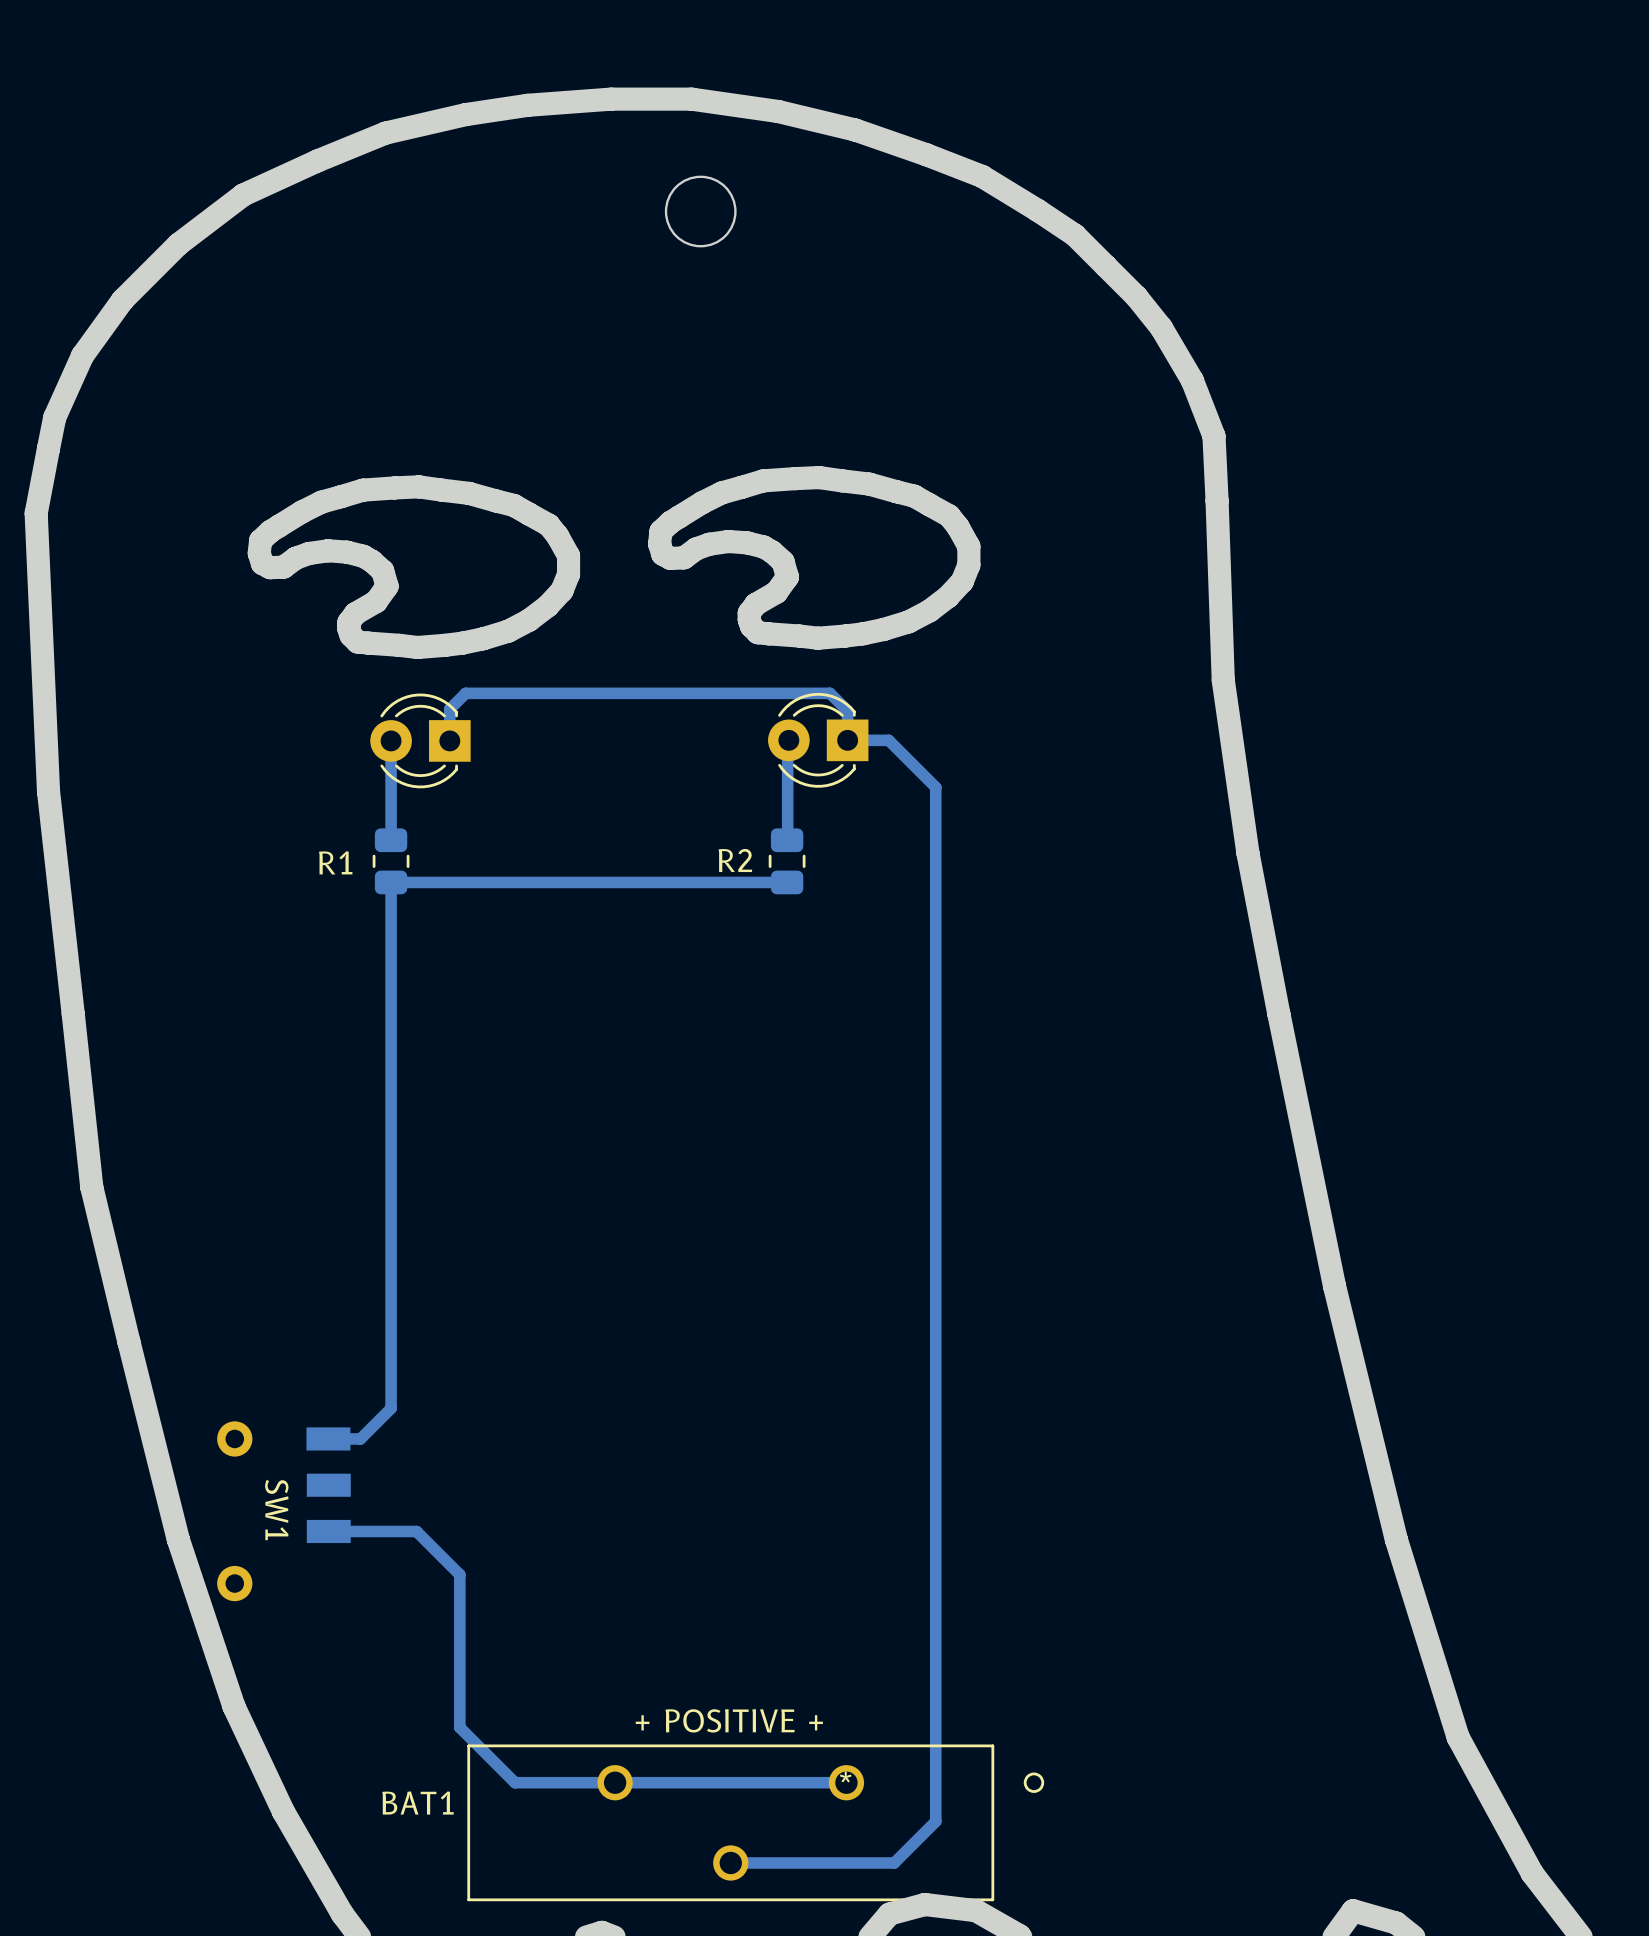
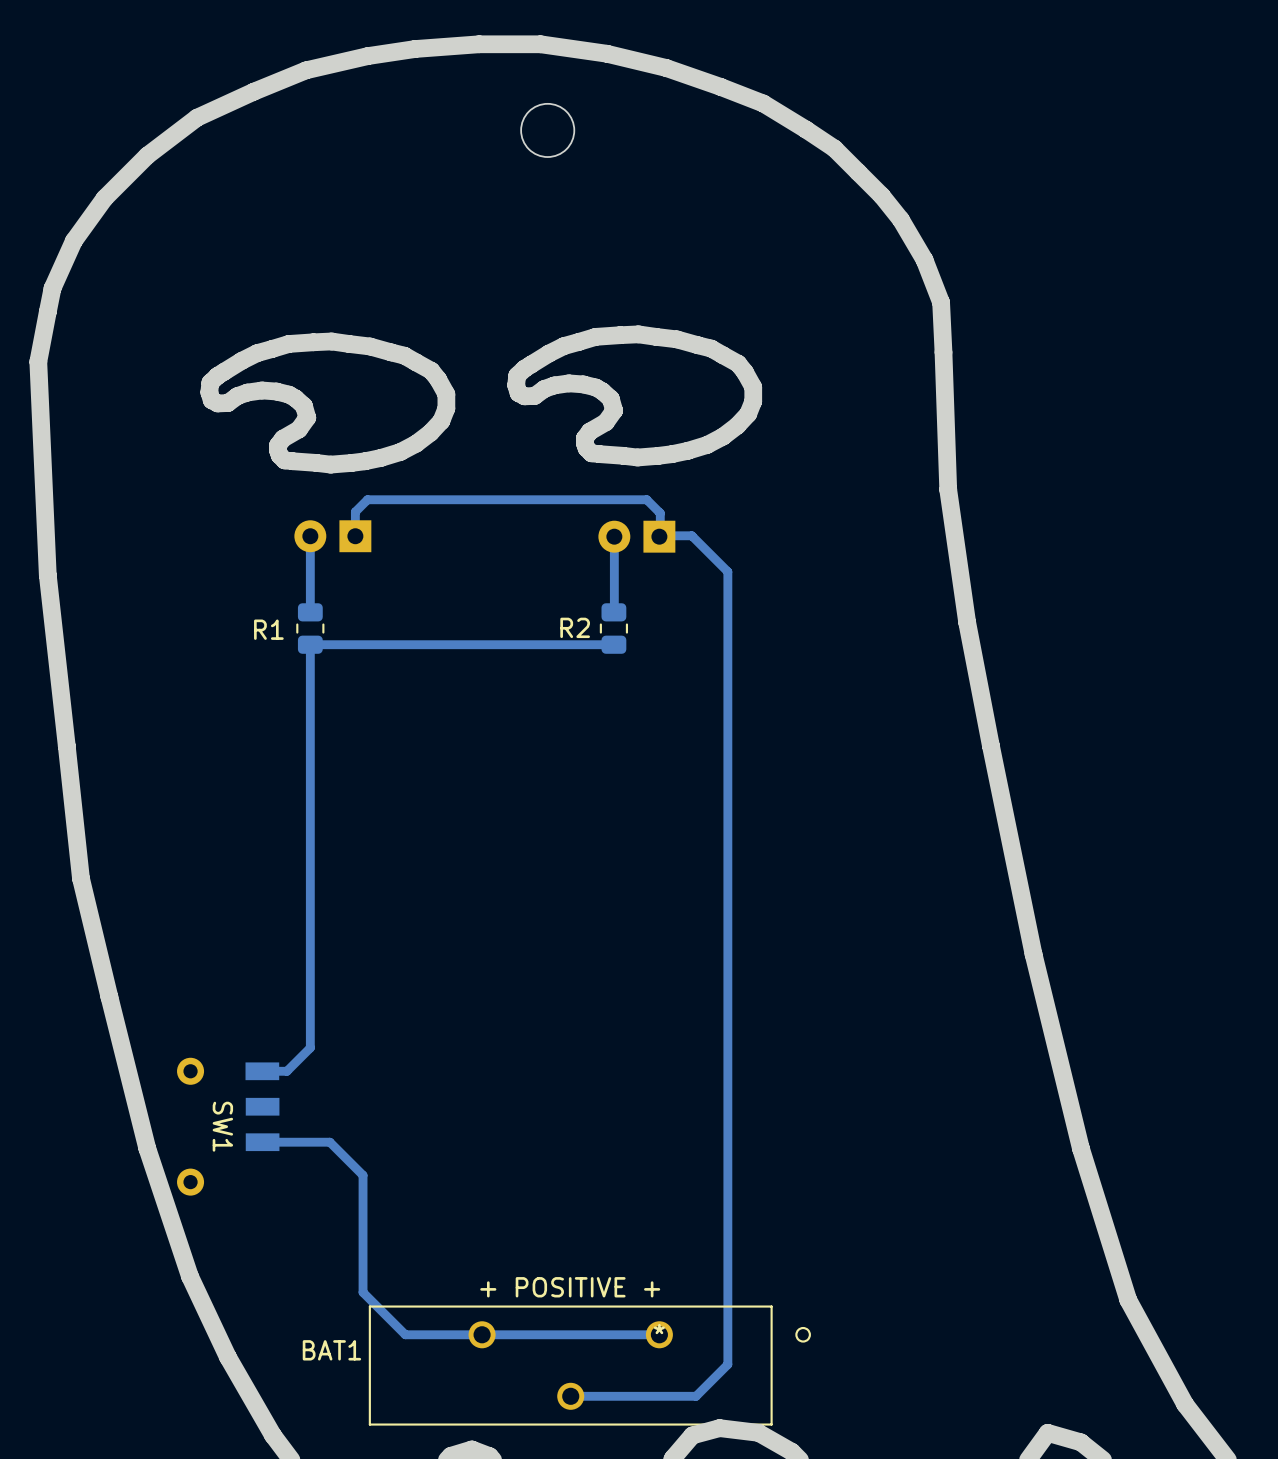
part side: bottom (420, 740) -> top (332, 536)
part side: bottom (818, 740) -> top (636, 536)

